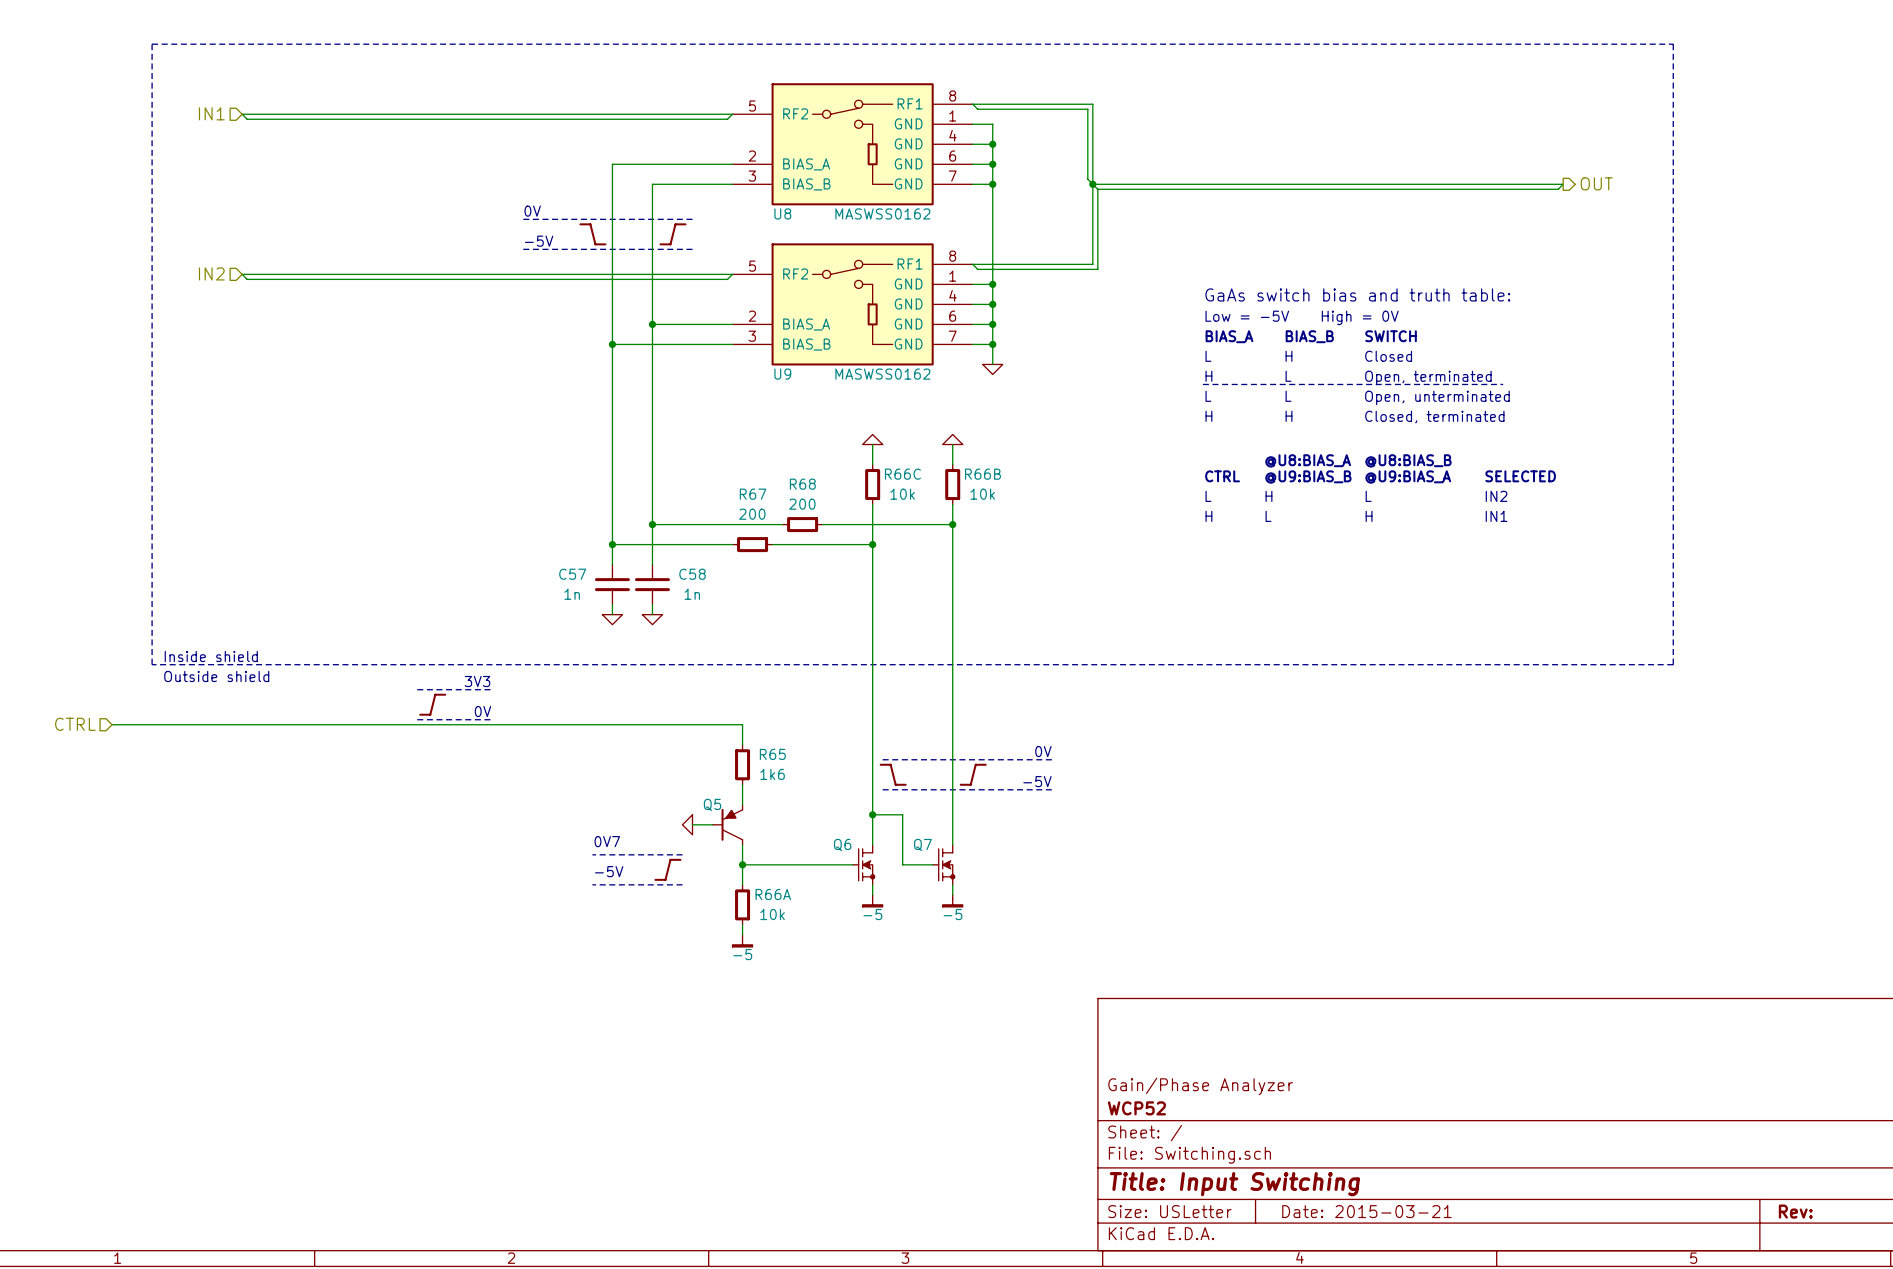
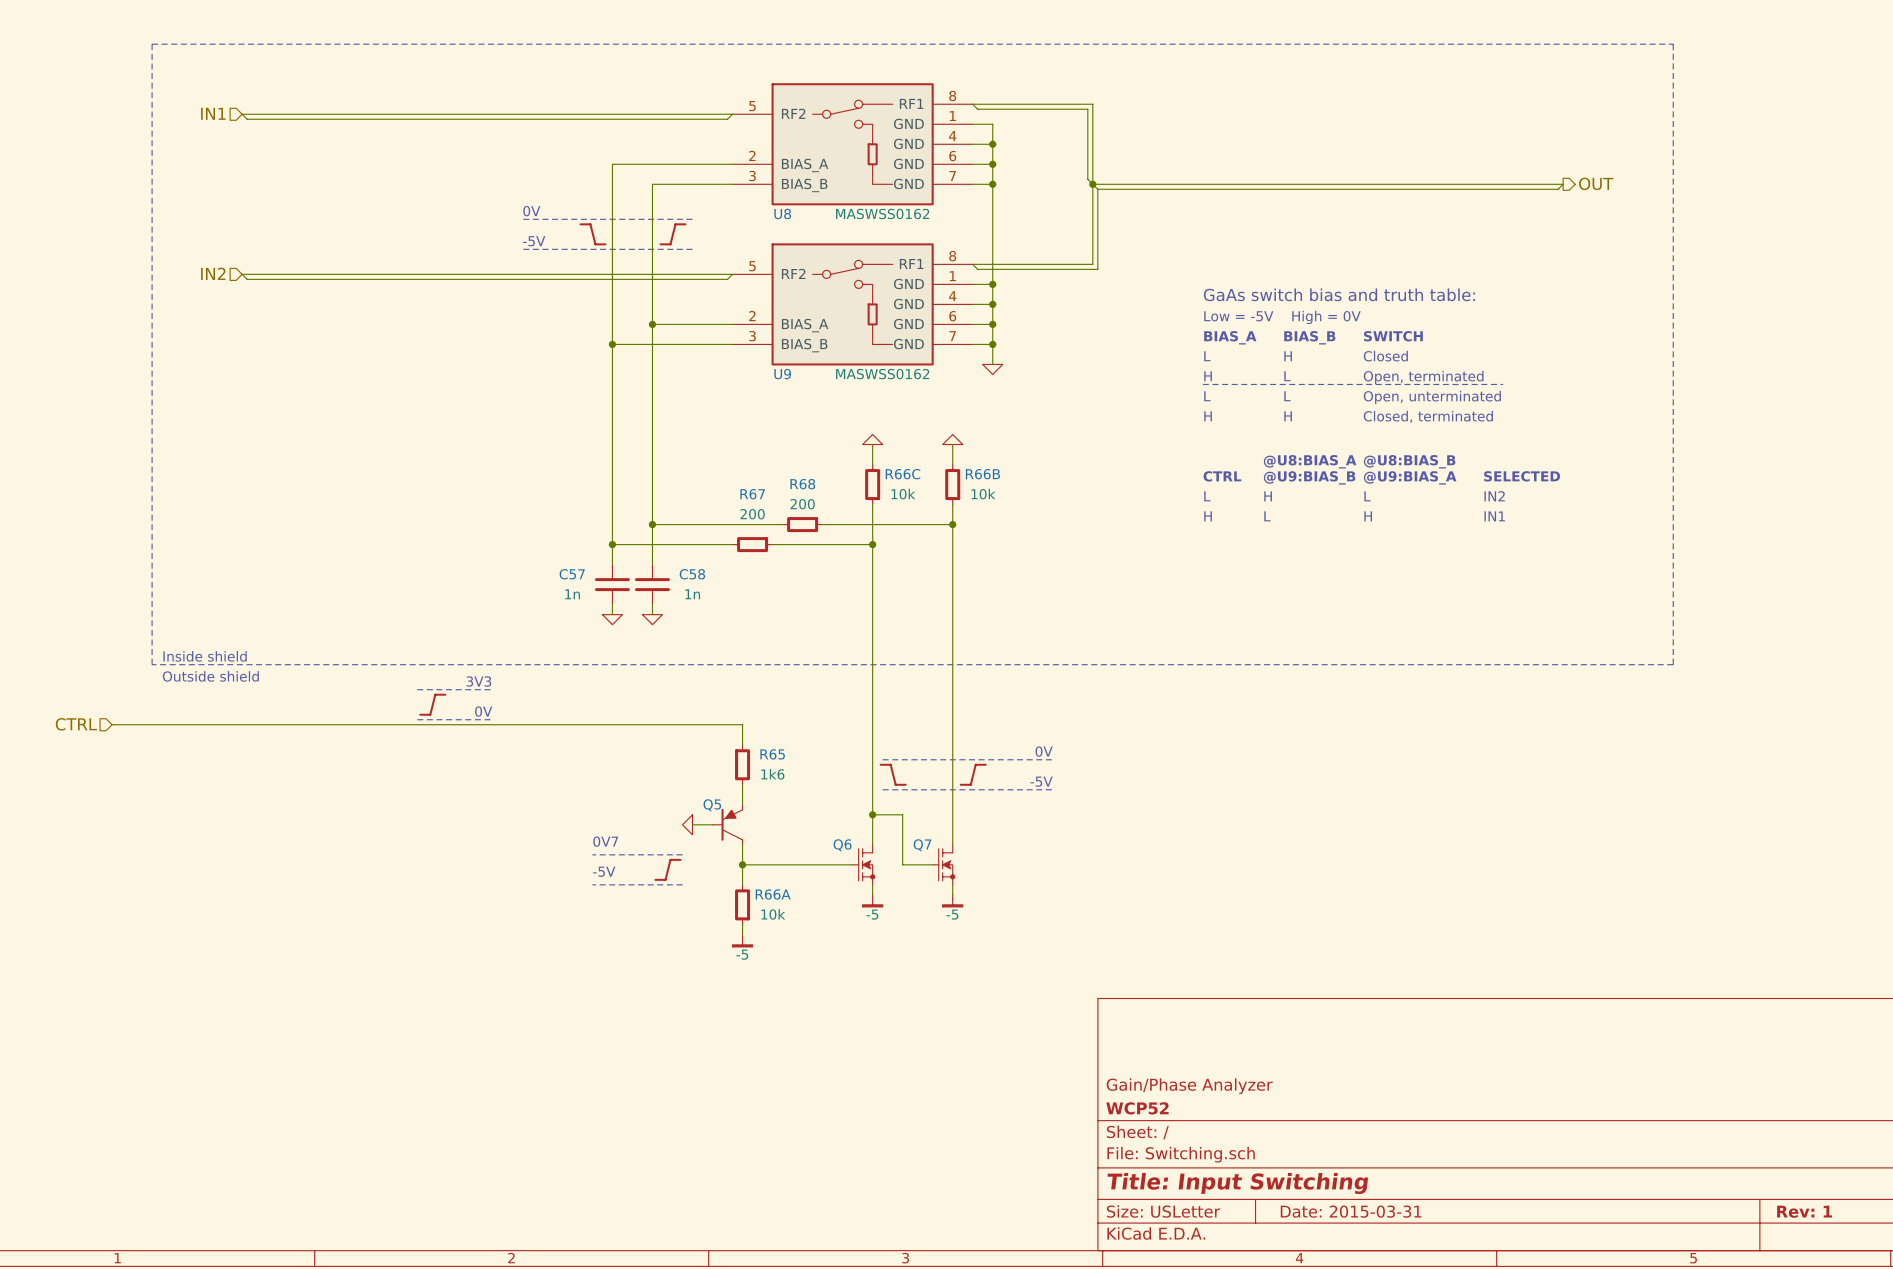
title block: Date: 2015-03-21 (1366, 1211) -> Date: 2015-03-31 (1351, 1211)
title block: Rev: (1795, 1211) -> Rev: 1 (1804, 1211)

